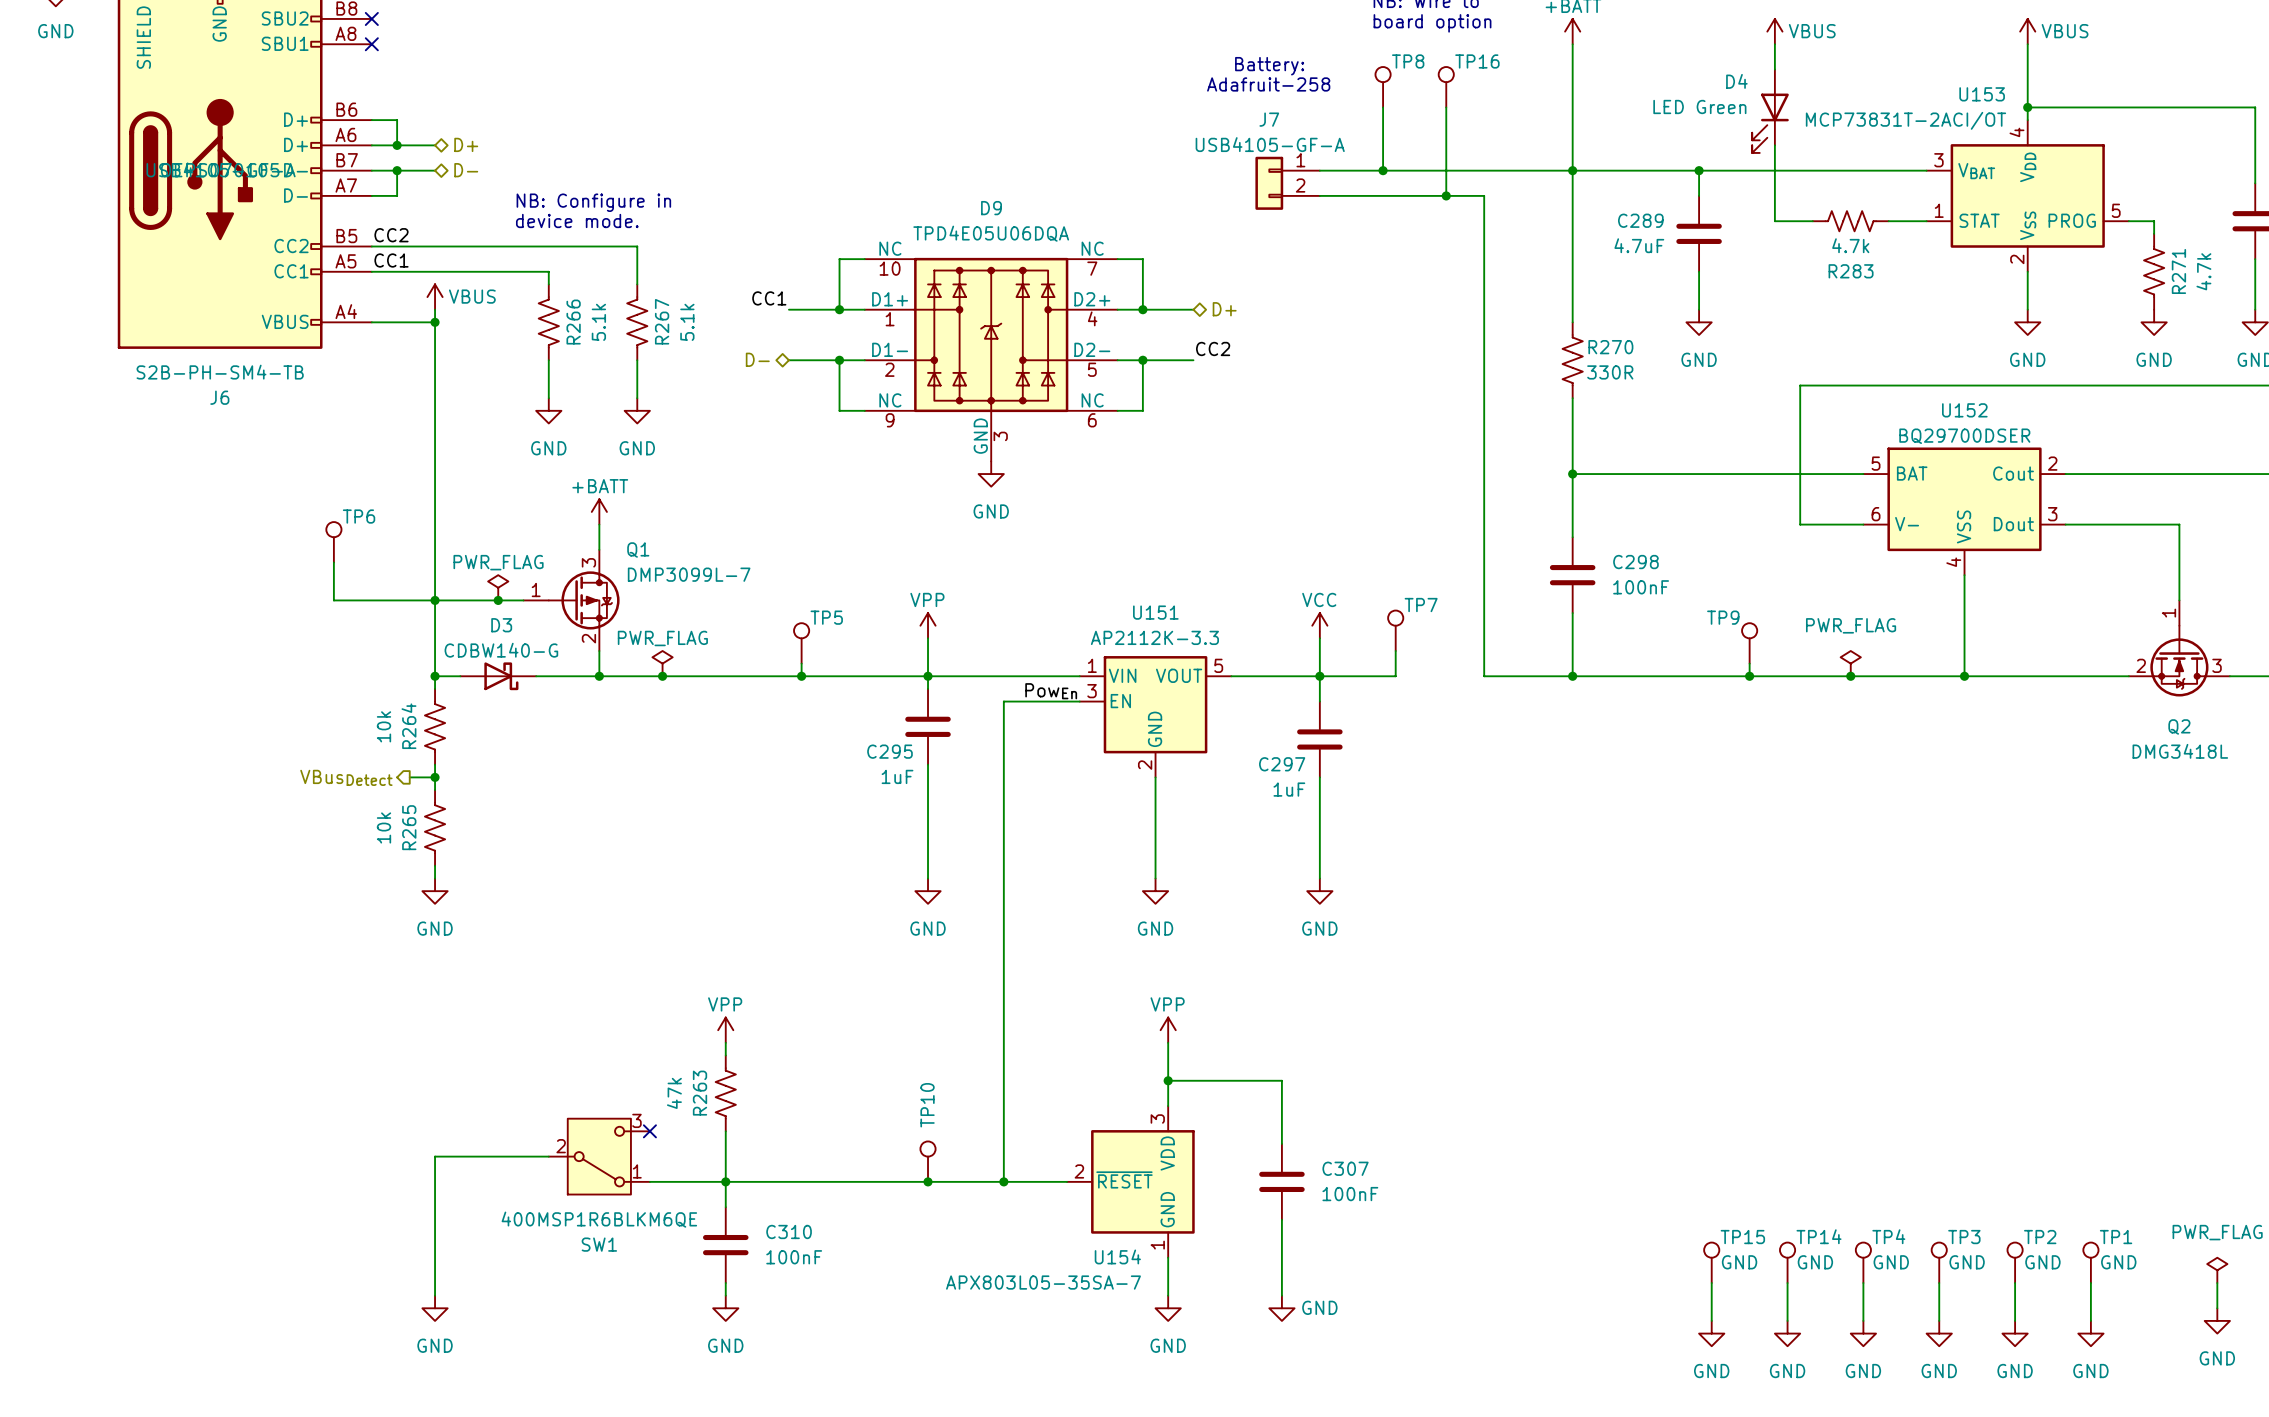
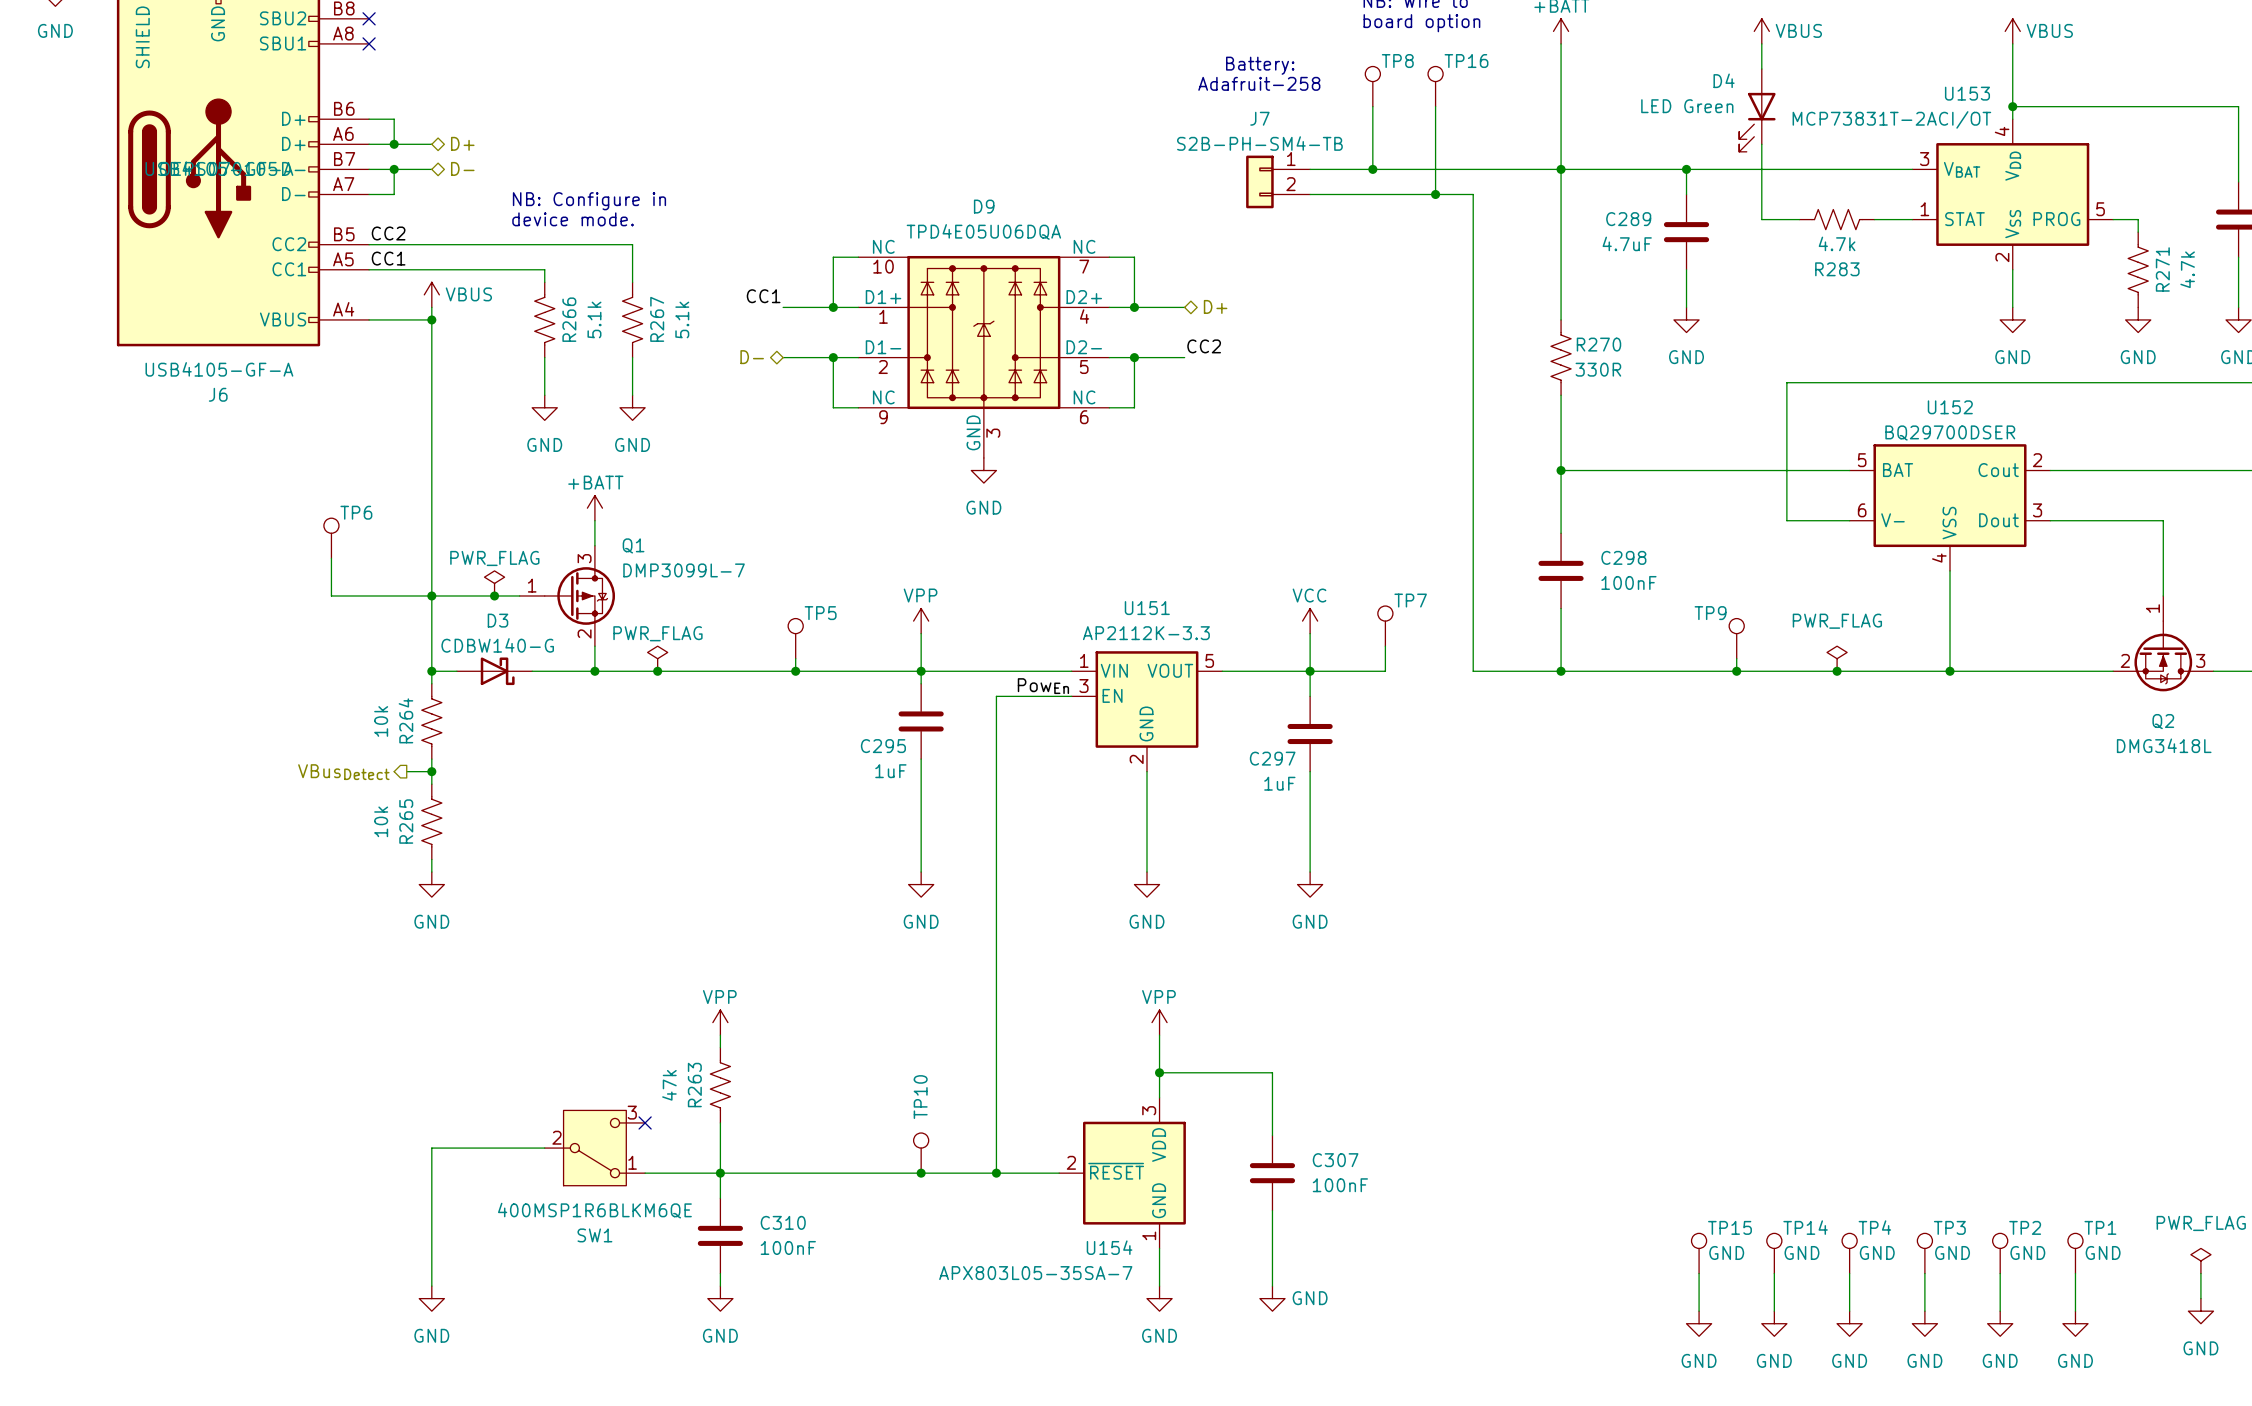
J7 value: USB4105-GF-A (1270, 144) -> S2B-PH-SM4-TB (1259, 143)
J6 value: S2B-PH-SM4-TB (220, 372) -> USB4105-GF-A (219, 369)

